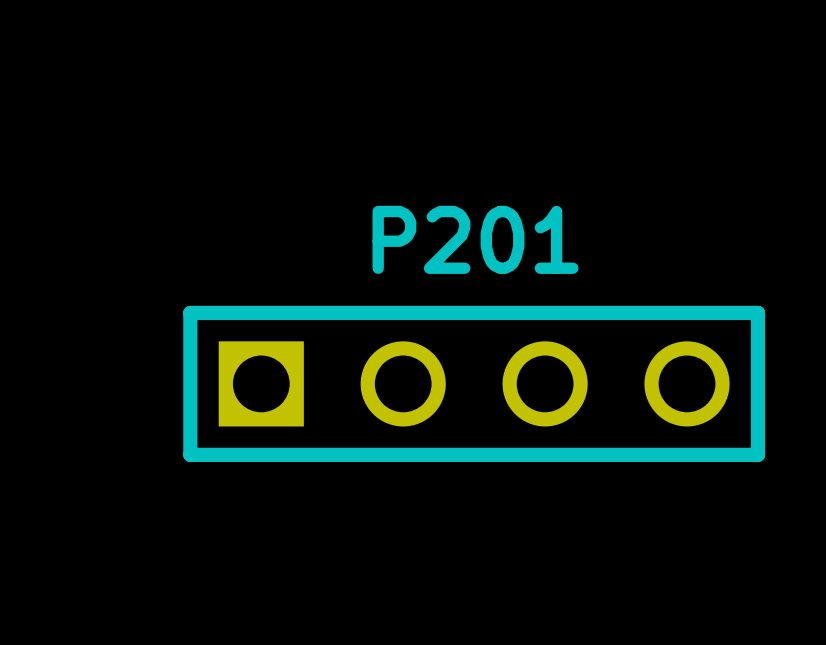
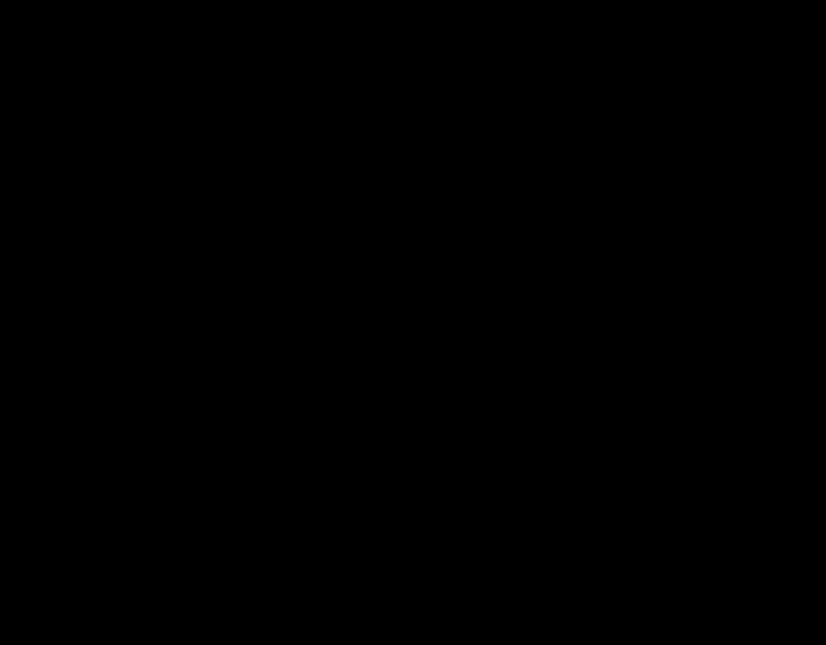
P201: (474, 383) -> none

